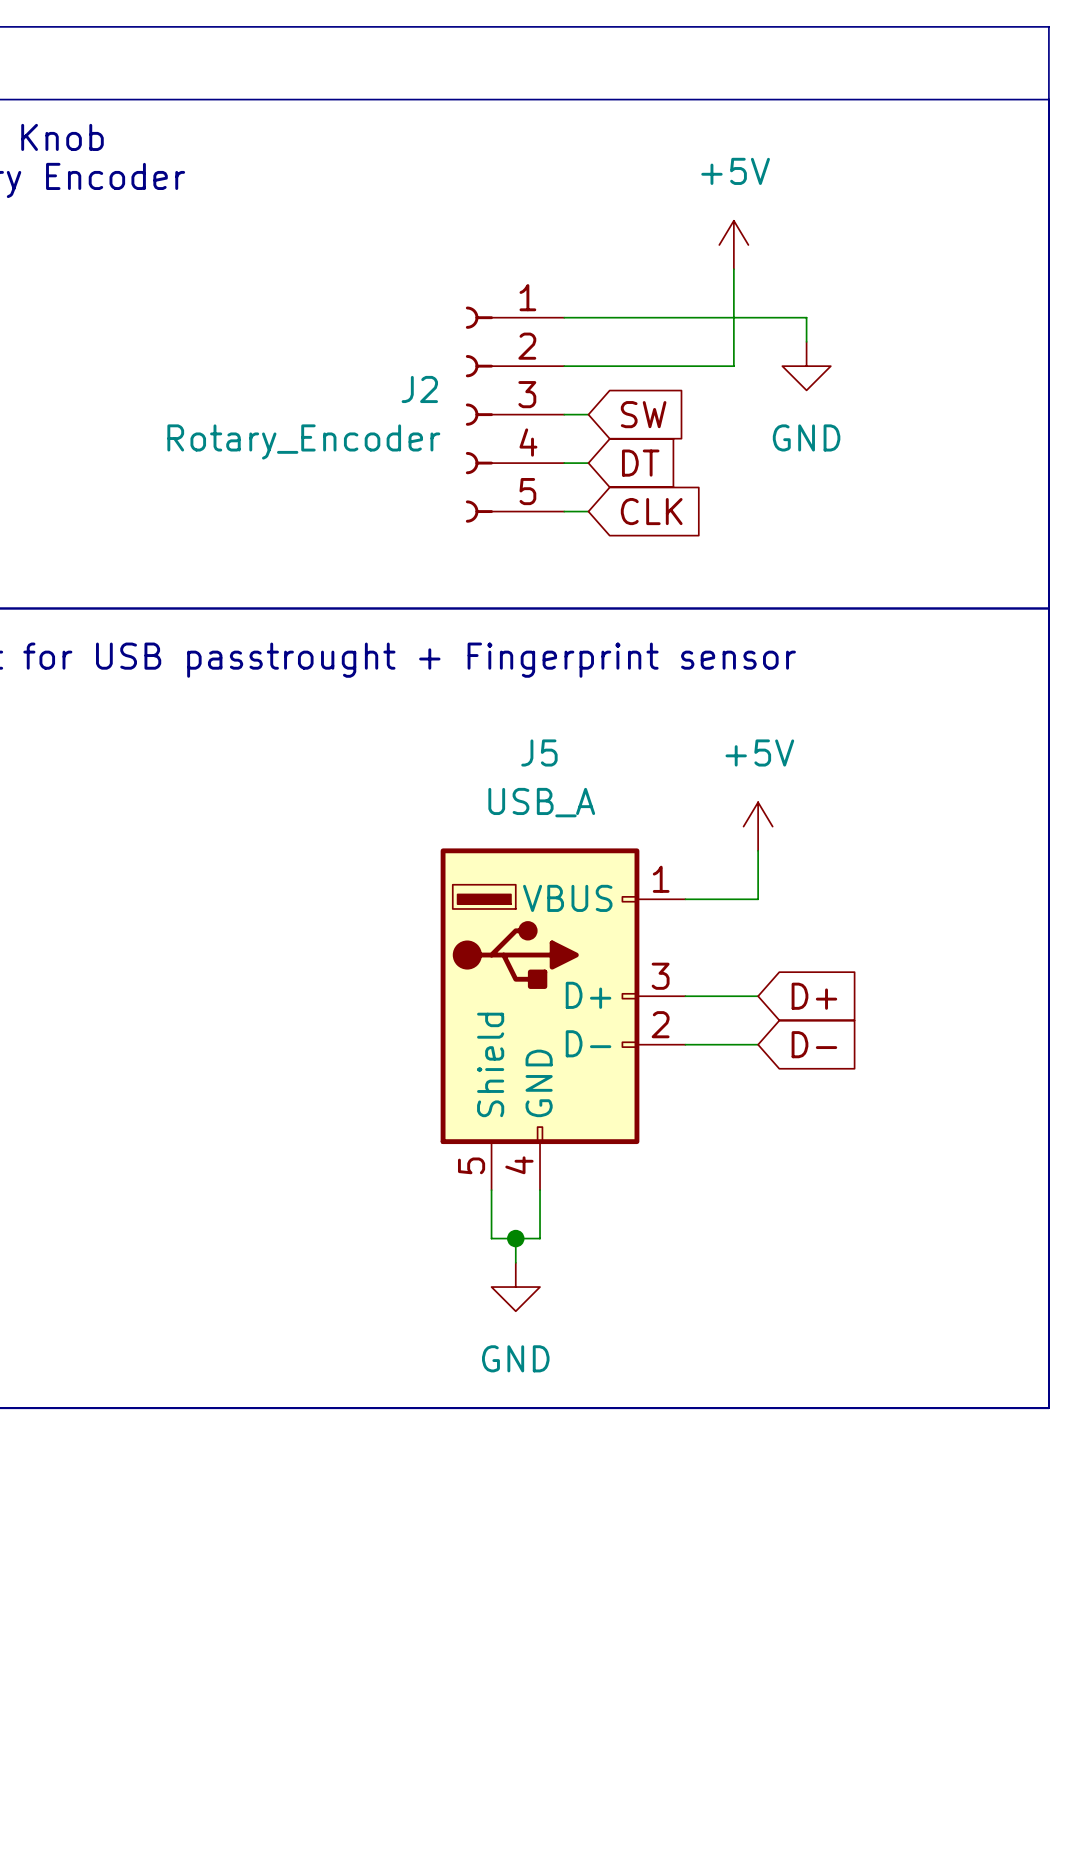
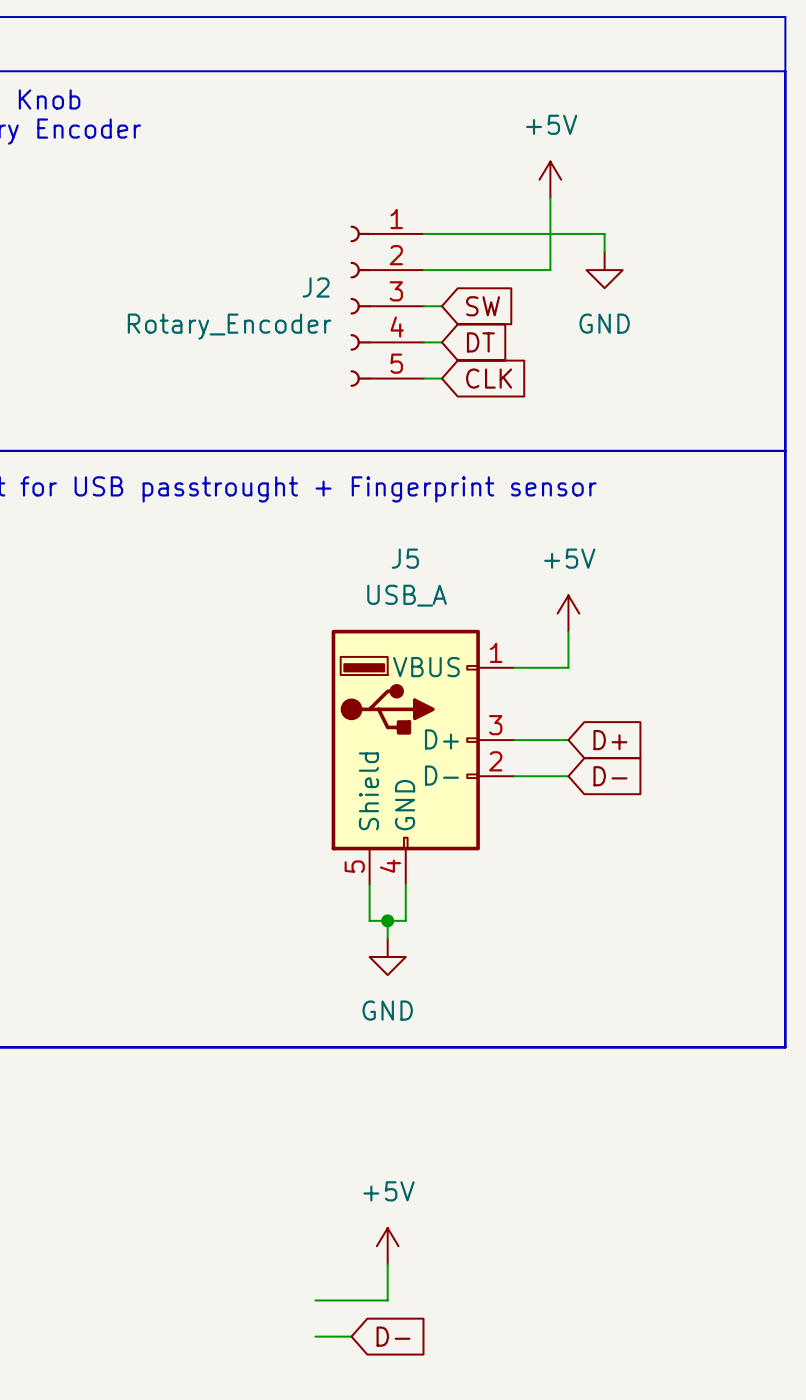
power symbol: none -> +5V (387, 1246)
wire: none -> (387, 1264) (387, 1300) (315, 1300)
wire: none -> (315, 1336) (351, 1336)
global label: none -> D- (393, 1336)

